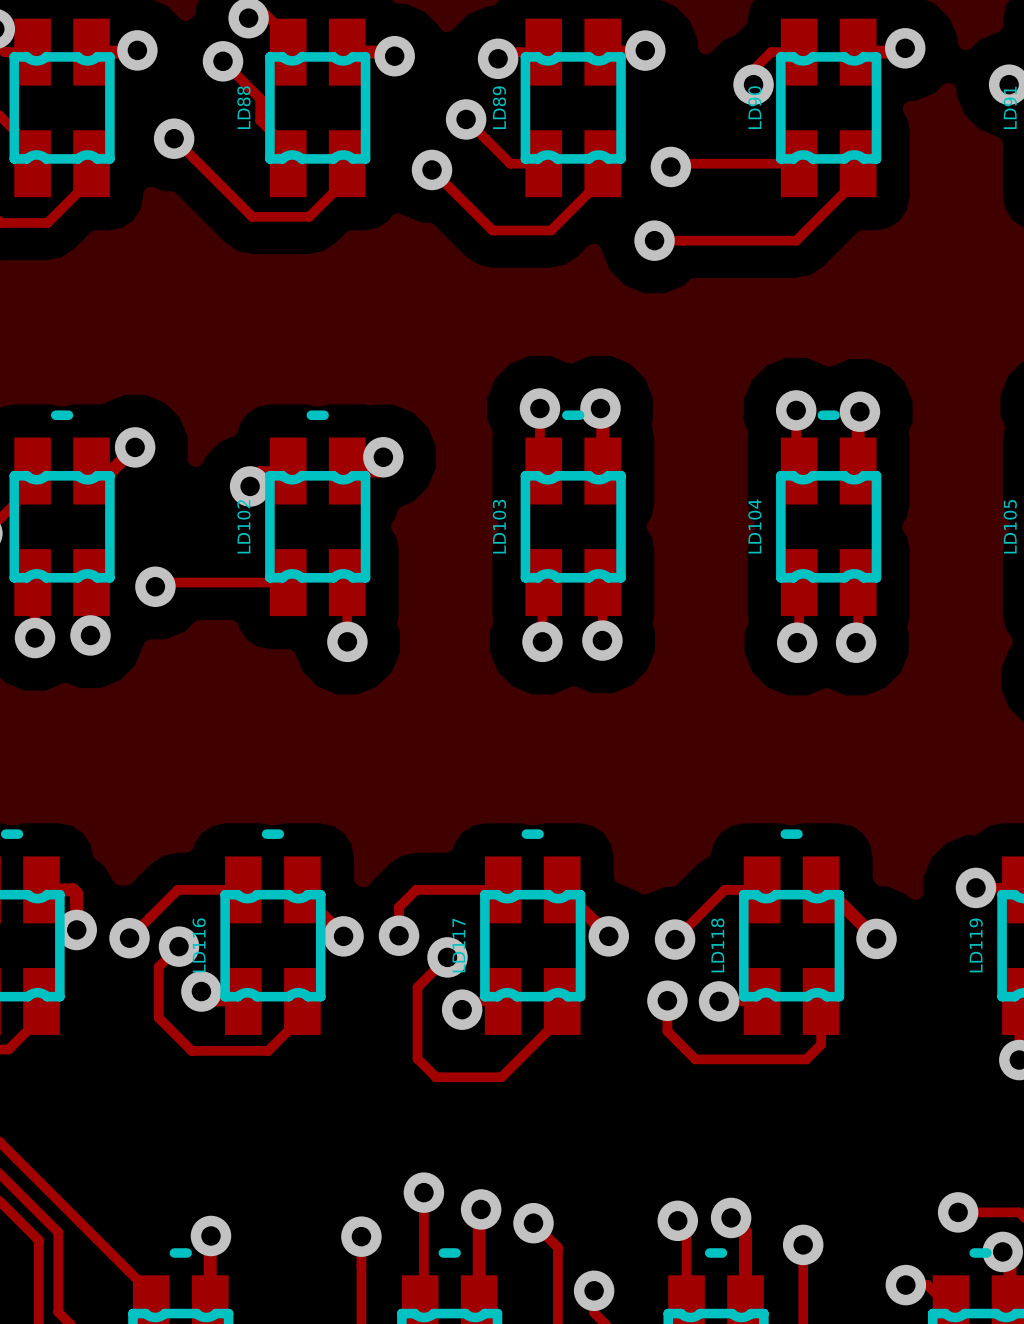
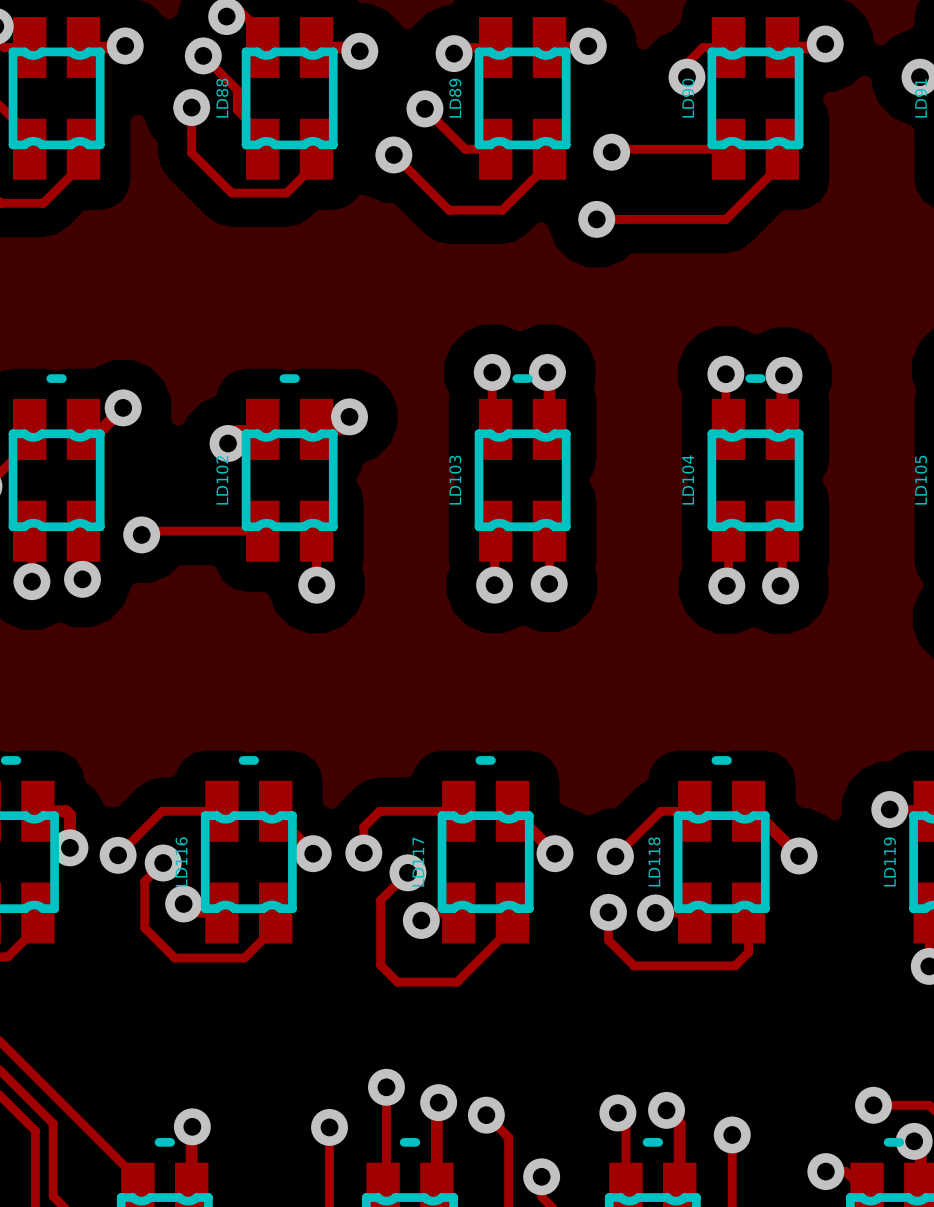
track: (174, 138) (252, 216) (309, 216) (314, 211) -> (191, 107) (191, 153) (231, 193) (286, 193)
via position: (174, 138) -> (191, 107)

